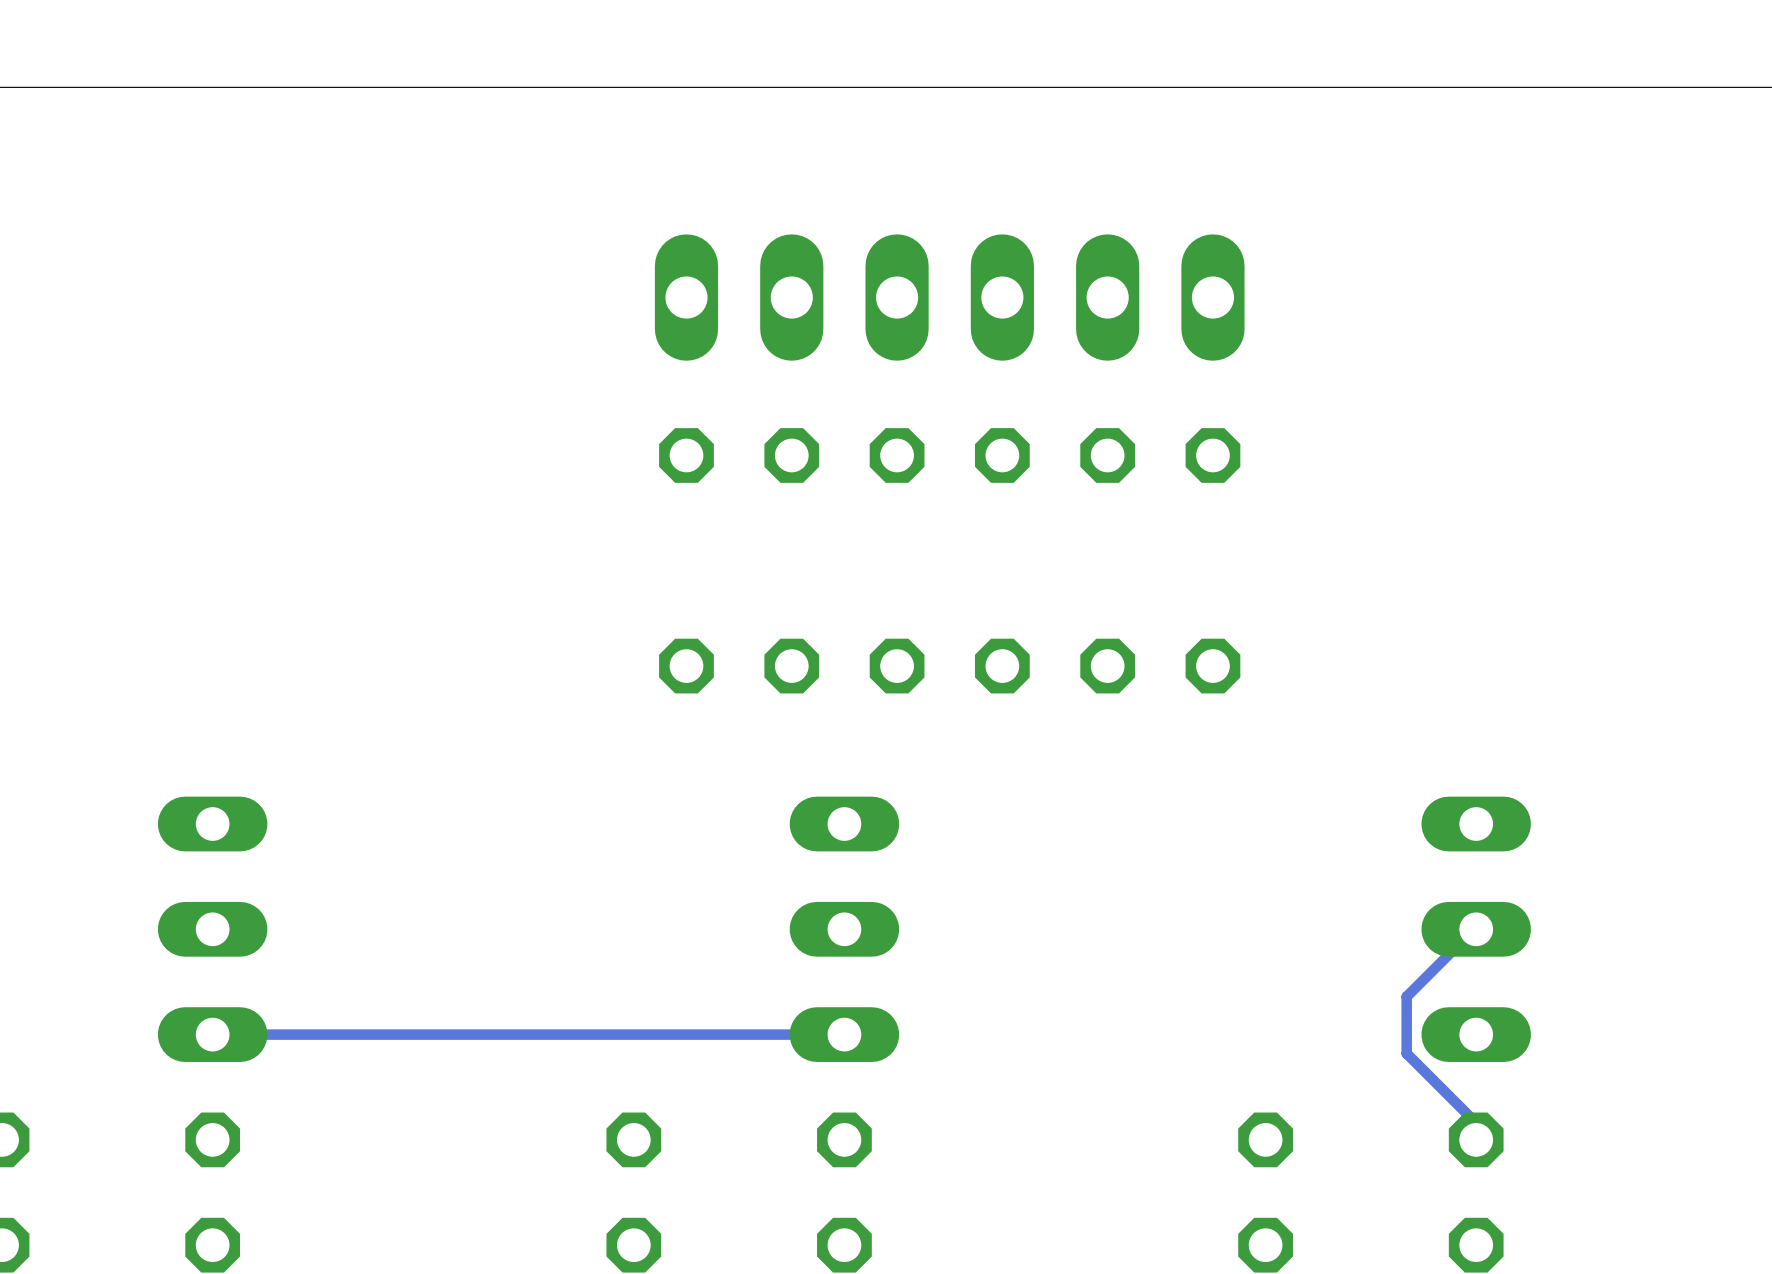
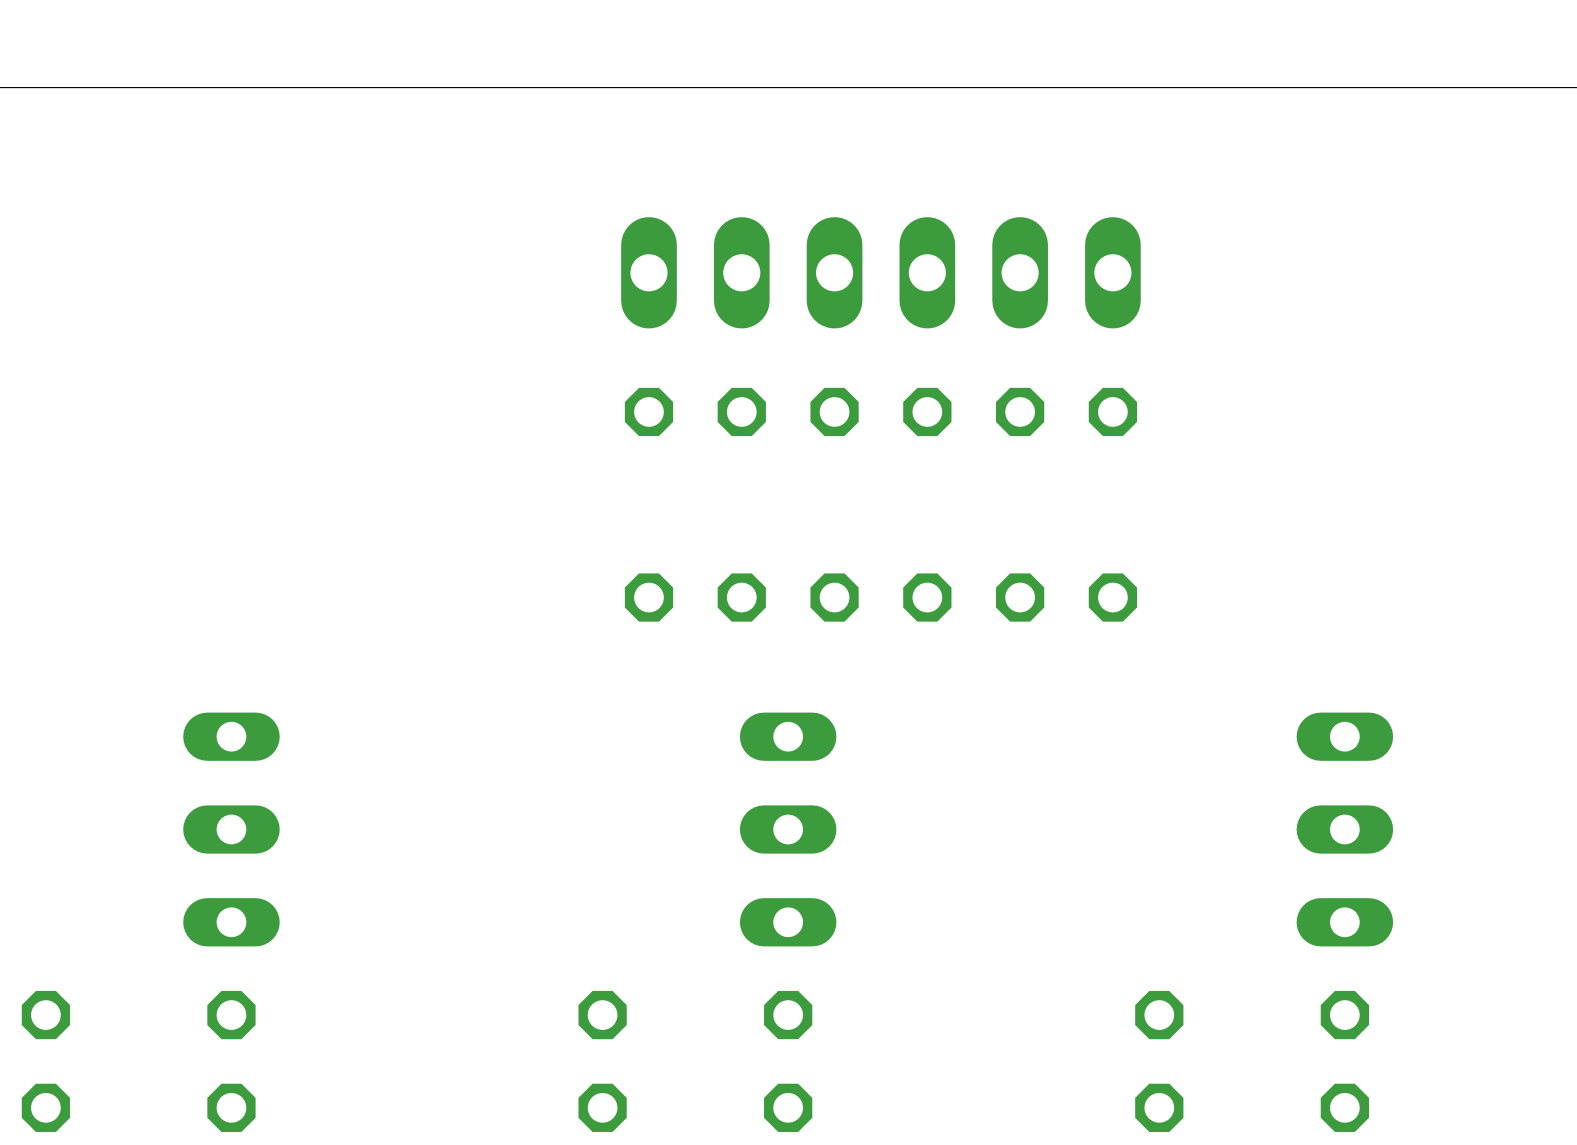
track: (1476, 929) (1406, 996) (1406, 1053) (1473, 1119) (1473, 1138) (1476, 1139) -> none
track: (844, 1034) (212, 1034) -> none

